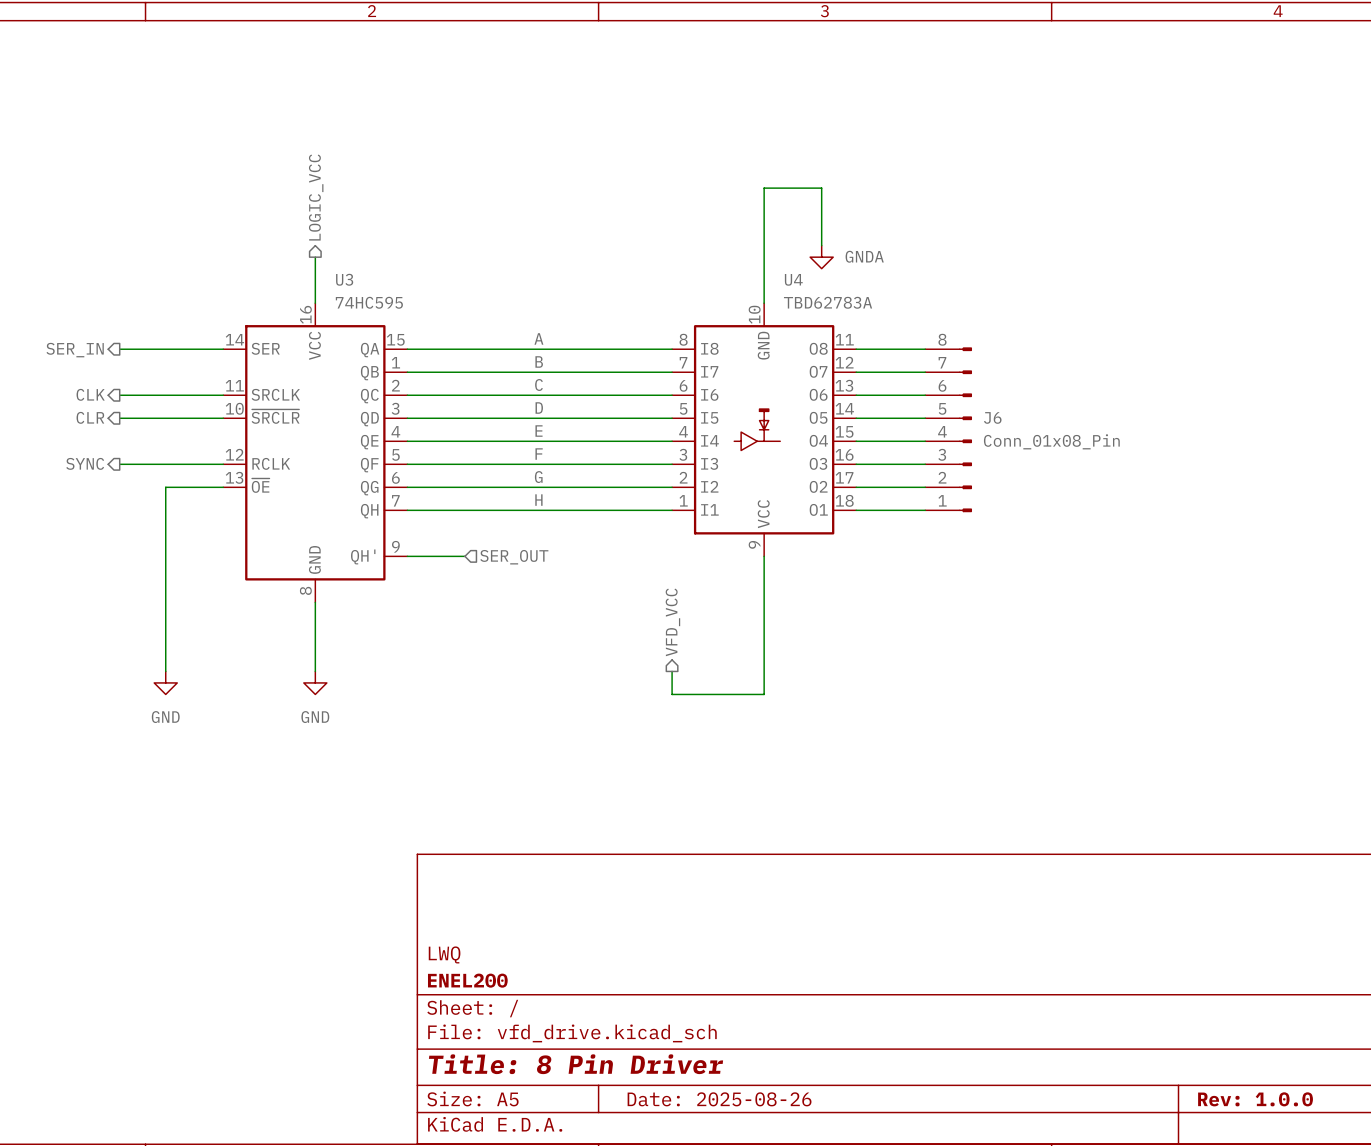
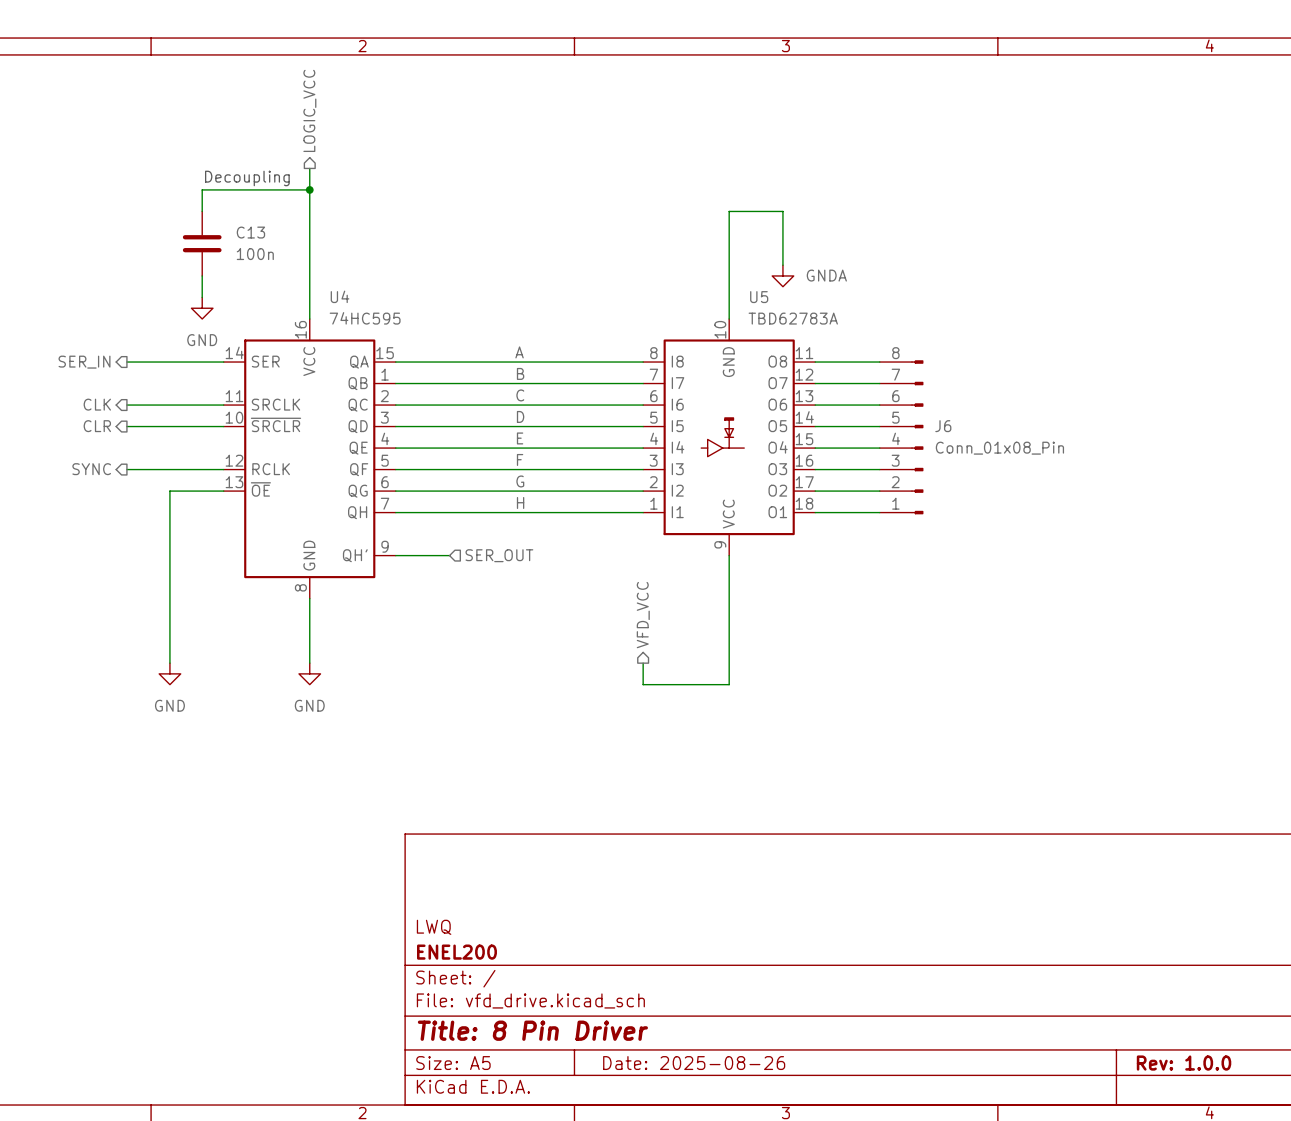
wire: none -> (309, 168) (309, 275)
text: none -> Decoupling (247, 178)
wire: none -> (309, 189) (202, 189) (202, 211)
junction: none -> (309, 189)
hierarchical label position: LOGIC_VCC (316, 197) -> LOGIC_VCC (309, 110)
C13: none -> 100n (202, 243)
wire: none -> (202, 275) (202, 297)
U3 name: U3 (344, 279) -> U4 (340, 296)
U4 name: U4 (793, 279) -> U5 (759, 297)
power symbol: none -> GND (202, 308)

